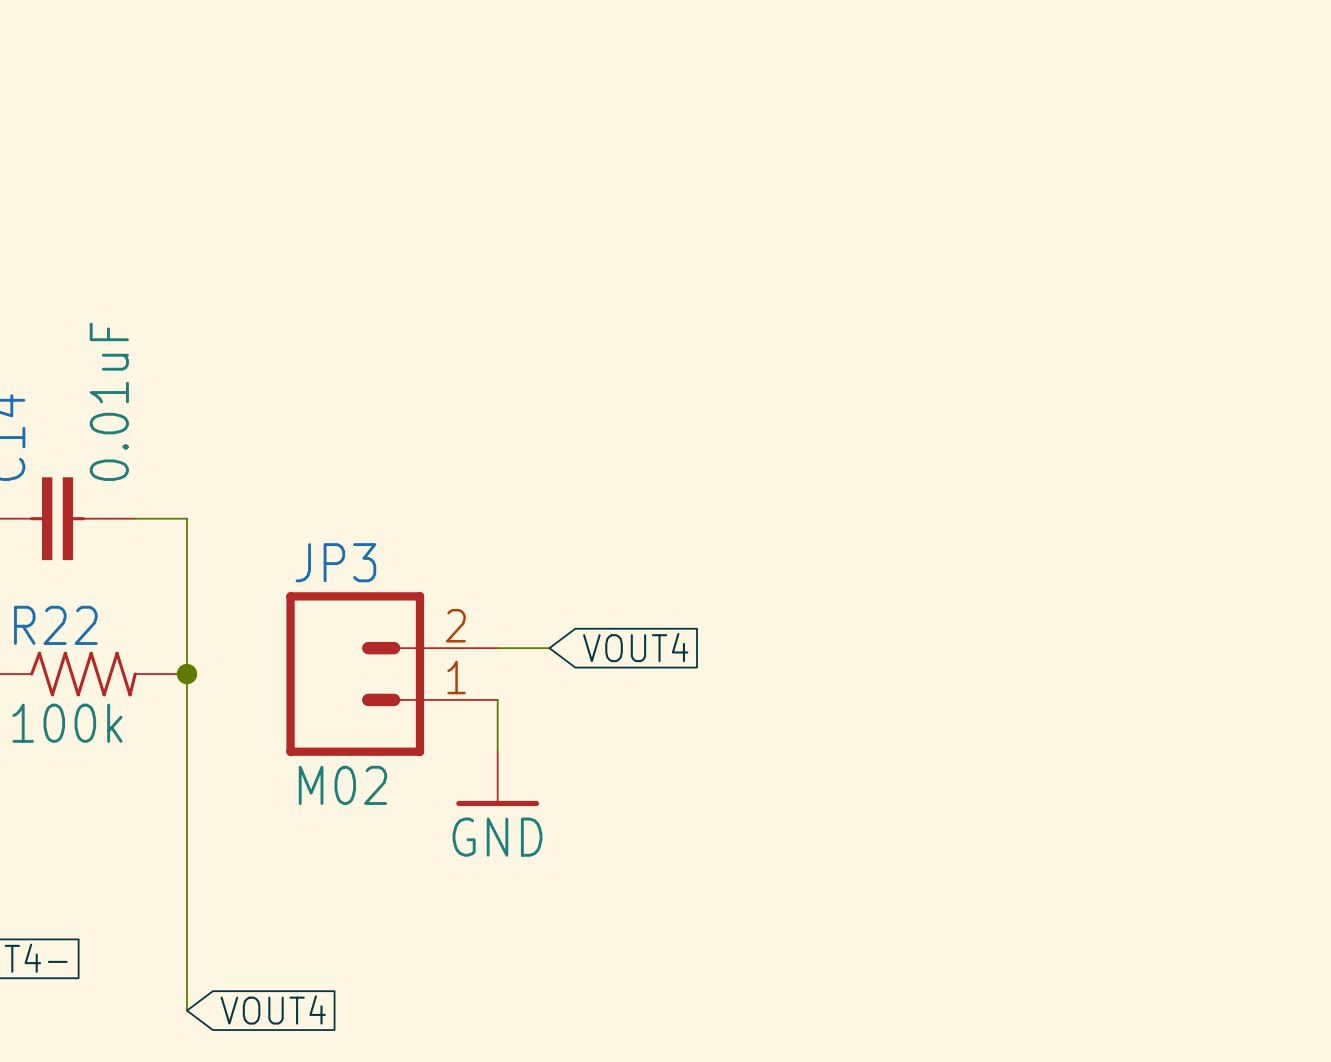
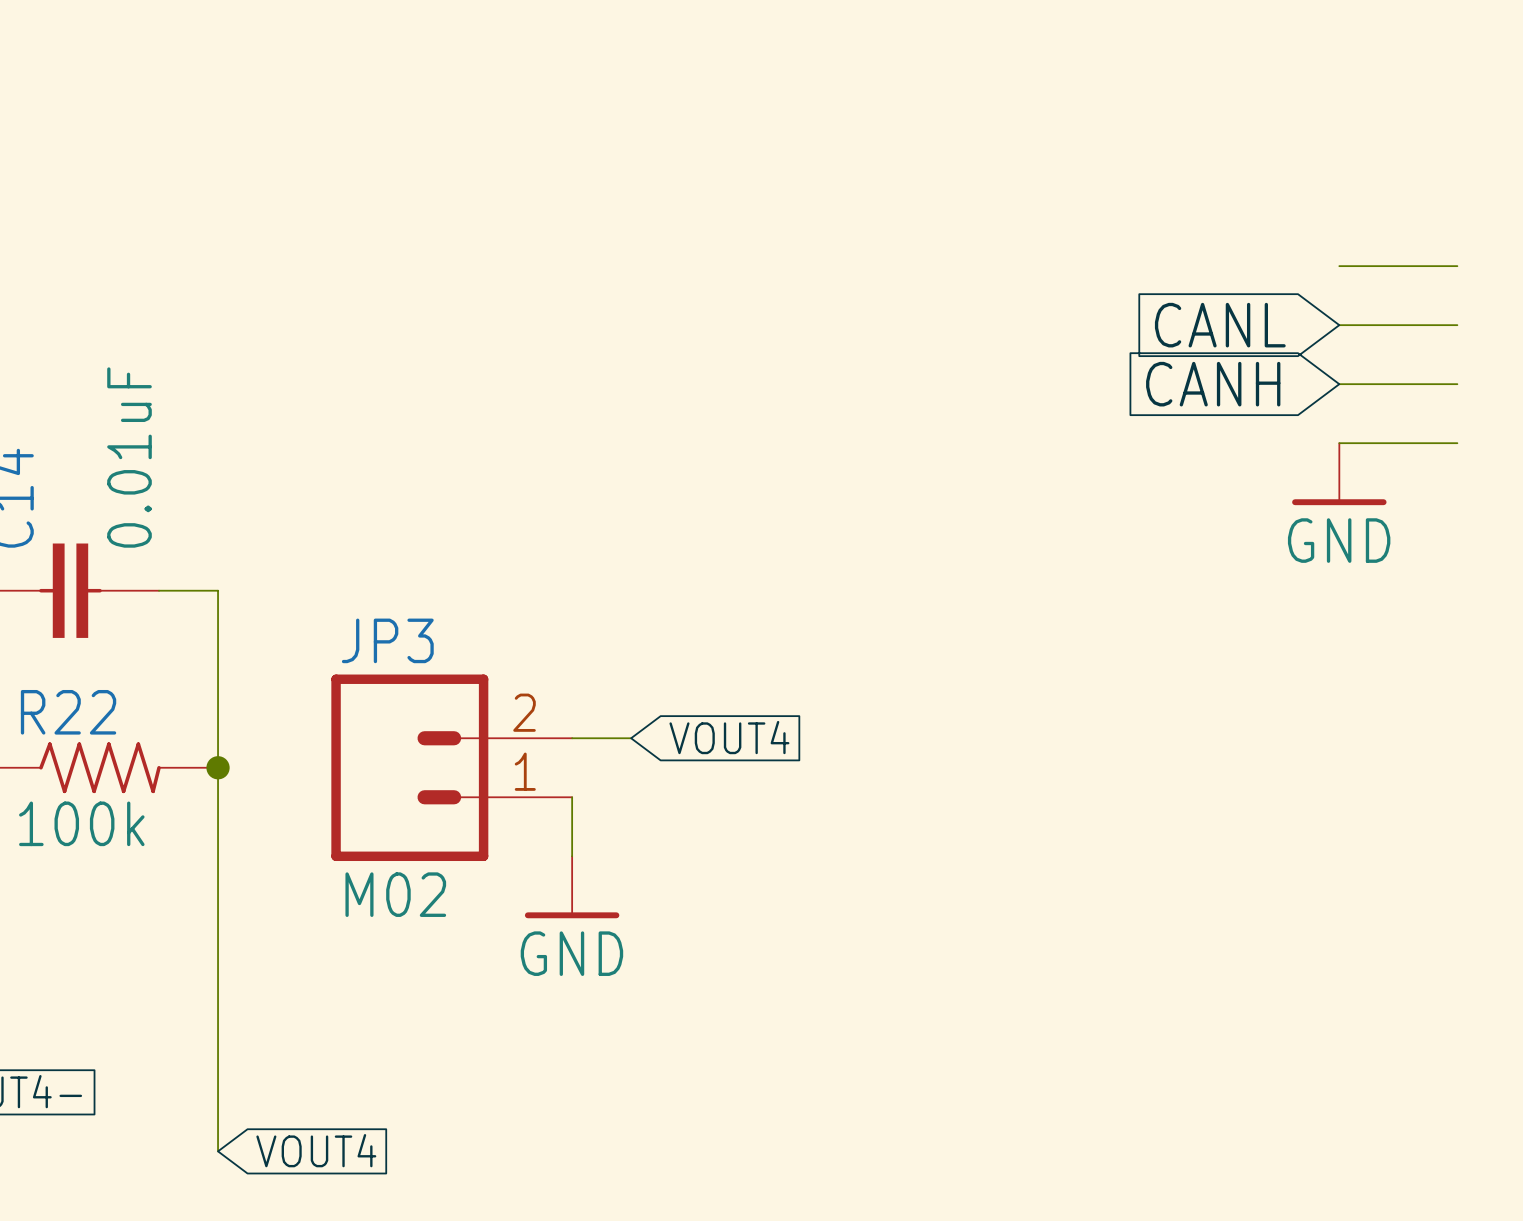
wire: none -> (1339, 266) (1457, 266)
global label: none -> CANL (1220, 325)
wire: none -> (1339, 325) (1457, 325)
global label: none -> CANH (1213, 384)
wire: none -> (1339, 384) (1457, 384)
wire: none -> (1339, 443) (1457, 443)
power symbol: none -> GND (1339, 474)

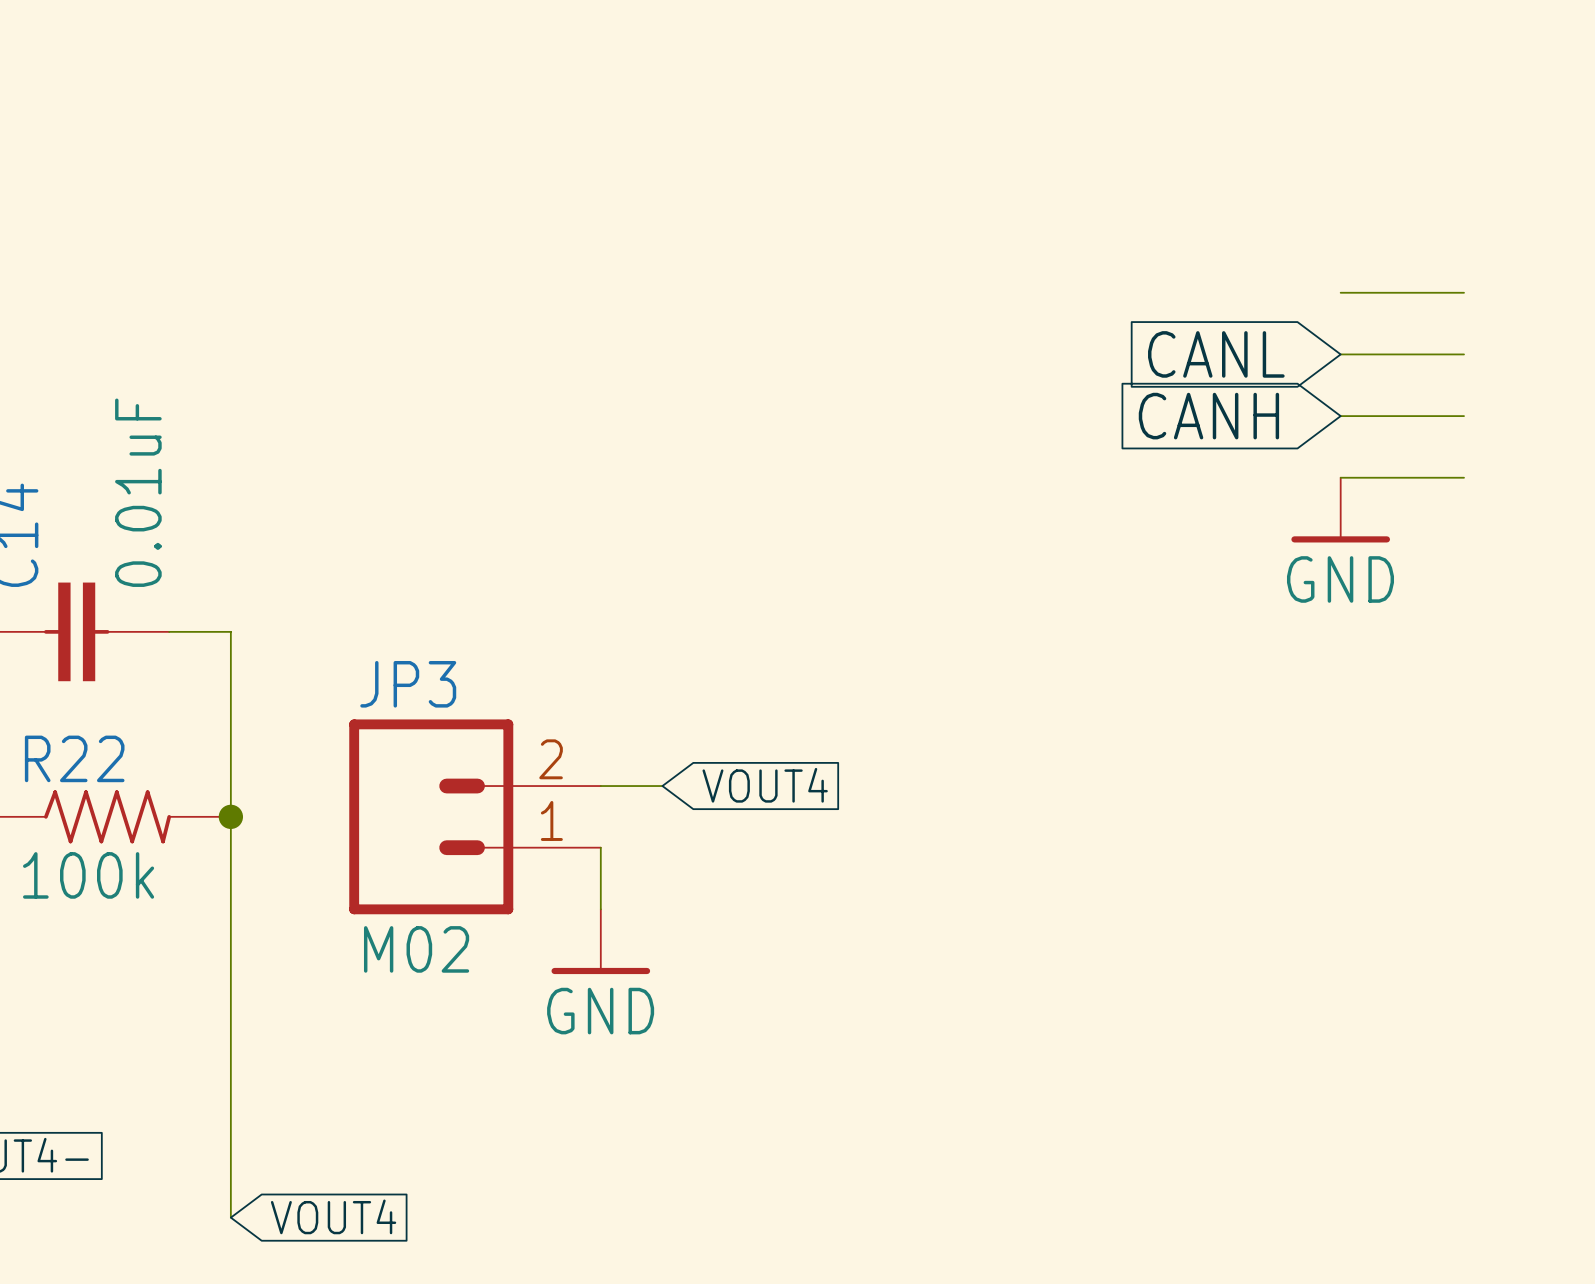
wire: (1398, 266) (1457, 266) -> (1340, 292) (1402, 292)
global label position: CANL (1220, 325) -> CANL (1216, 354)
wire: (1398, 325) (1457, 325) -> (1340, 354) (1402, 354)
global label position: CANH (1213, 384) -> CANH (1208, 416)
wire: (1398, 384) (1457, 384) -> (1340, 416) (1402, 416)
wire: (1398, 443) (1457, 443) -> (1340, 477) (1402, 477)
power symbol position: GND (1339, 474) -> GND (1340, 510)

